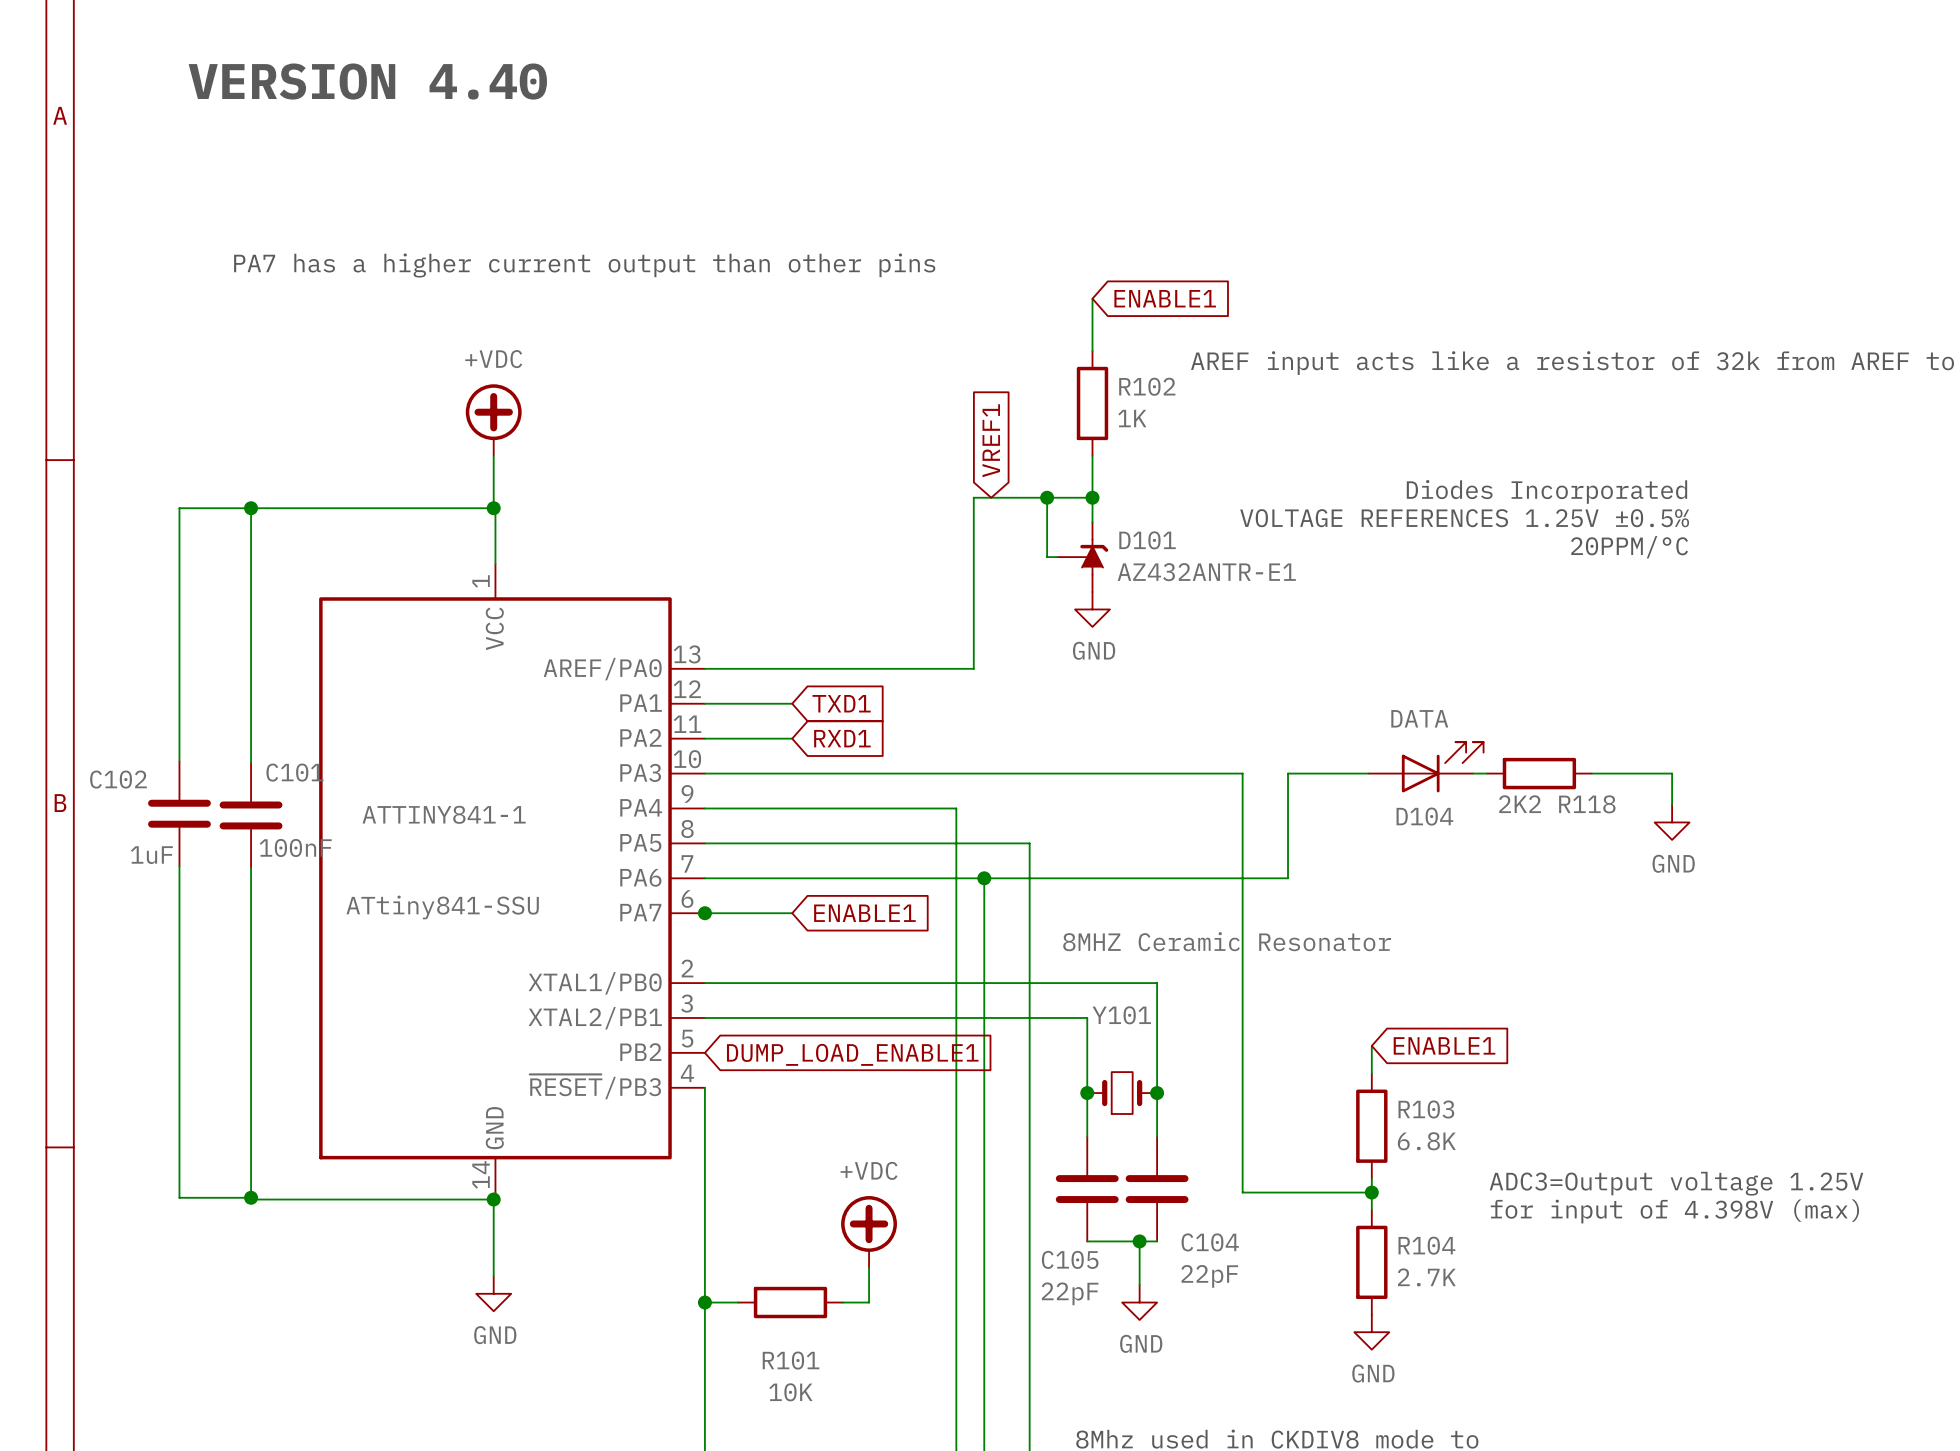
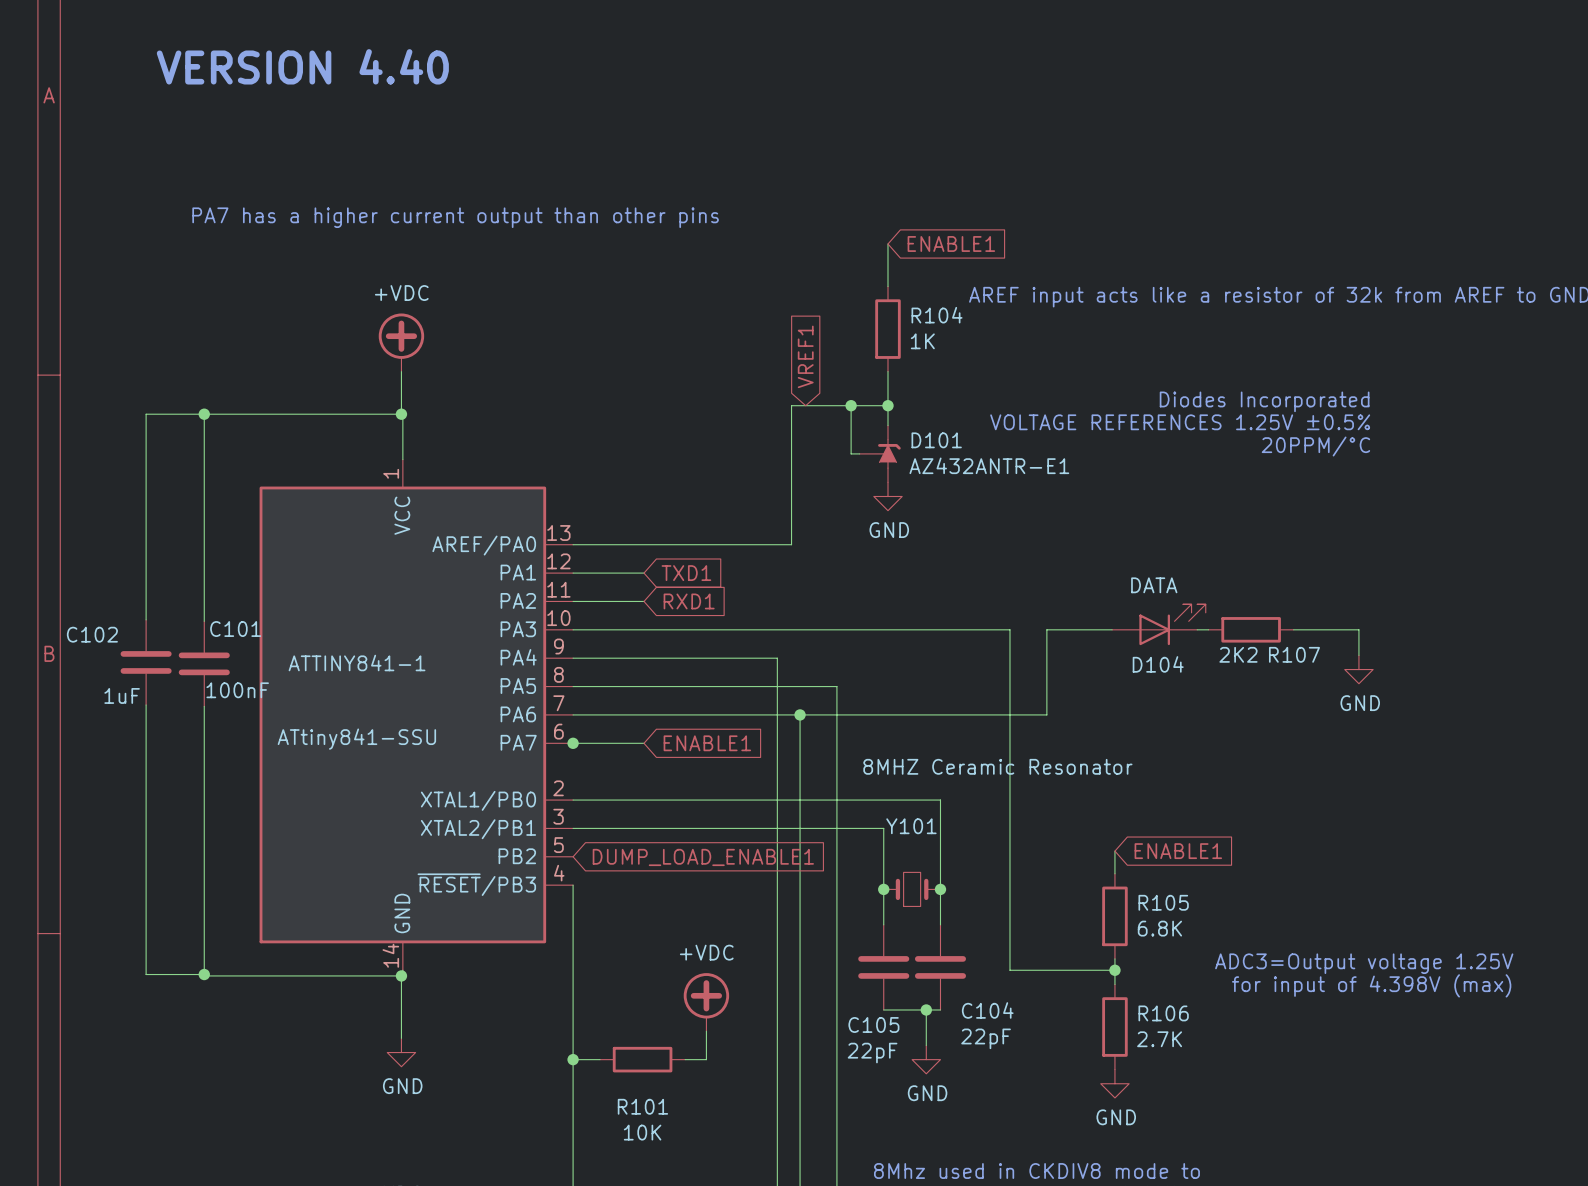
R102 name: R102 (1147, 386) -> R104 (937, 315)
R118 name: R118 (1587, 804) -> R107 (1294, 654)
R103 name: R103 (1426, 1109) -> R105 (1163, 902)
R104 name: R104 (1426, 1245) -> R106 (1163, 1013)

